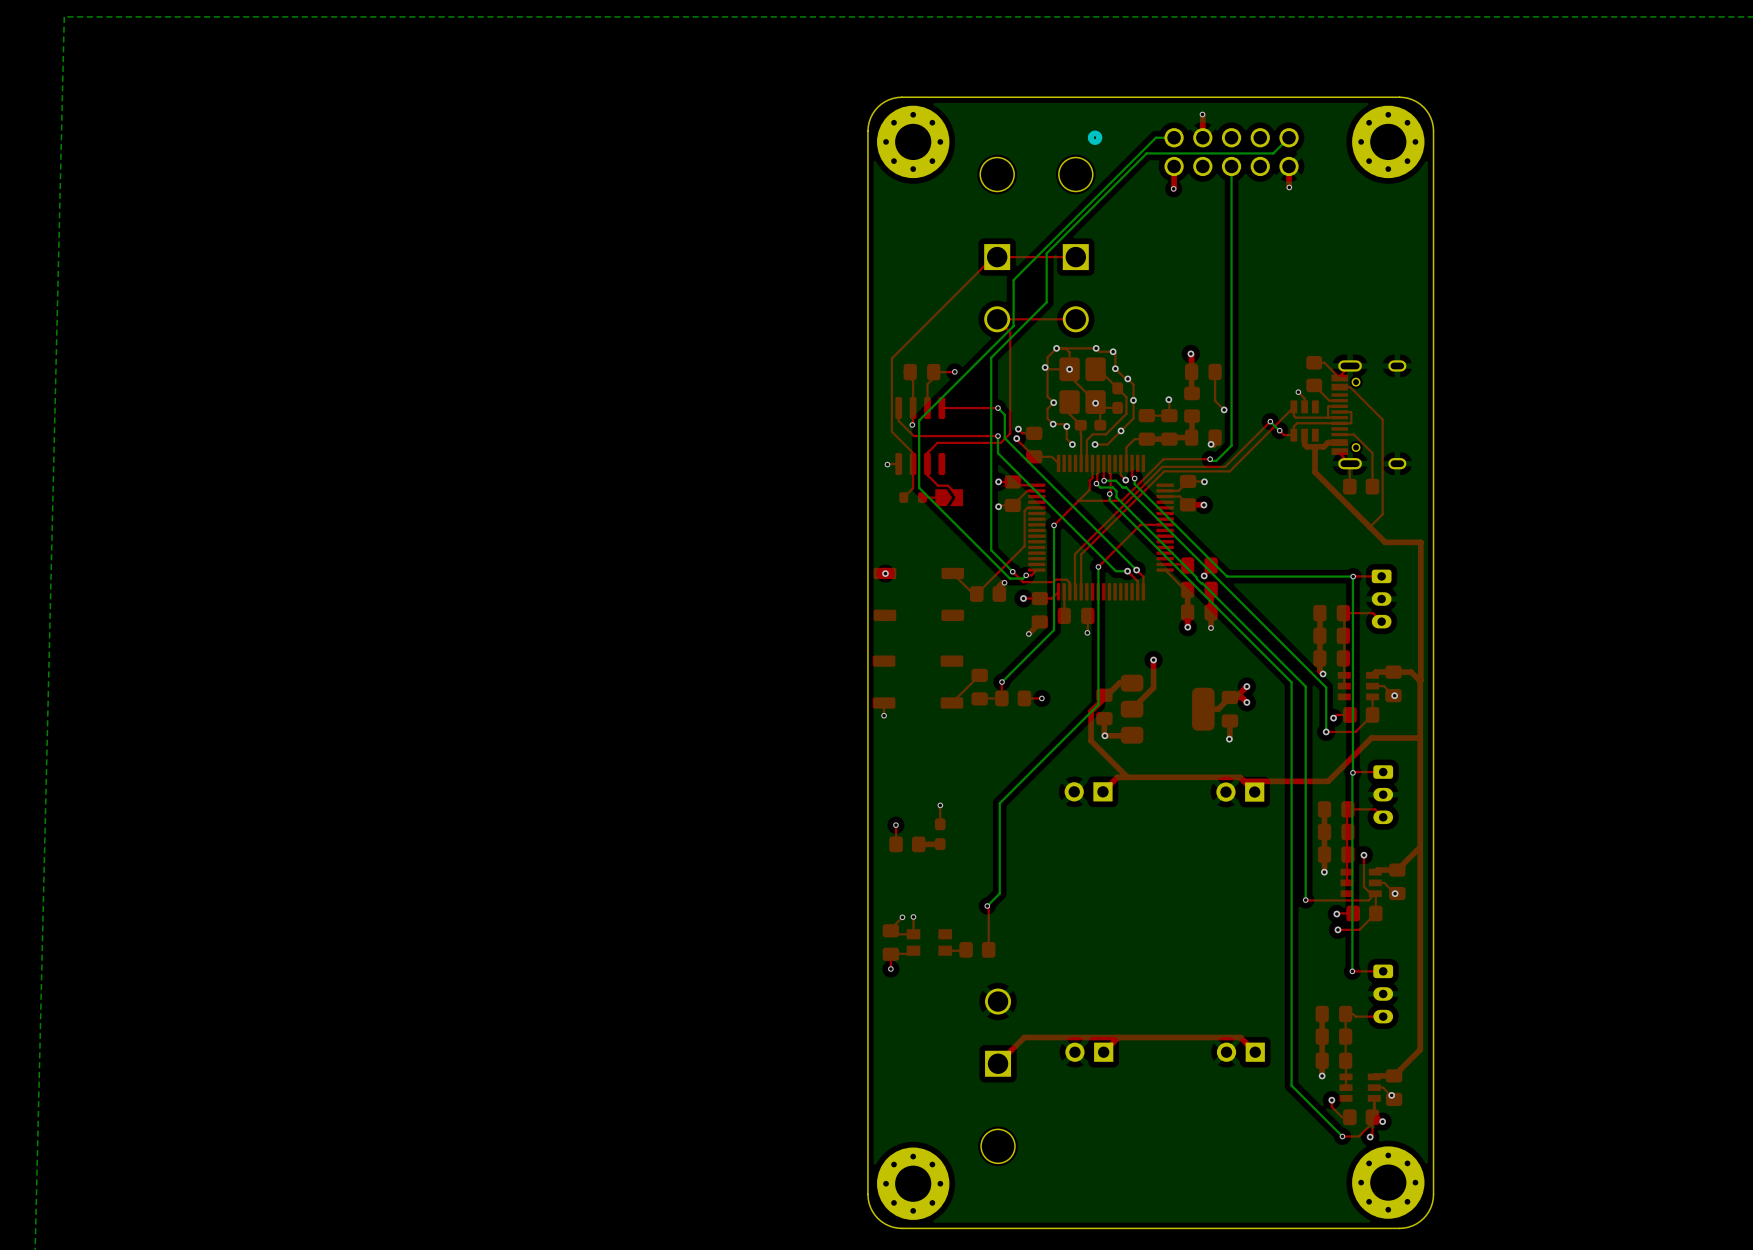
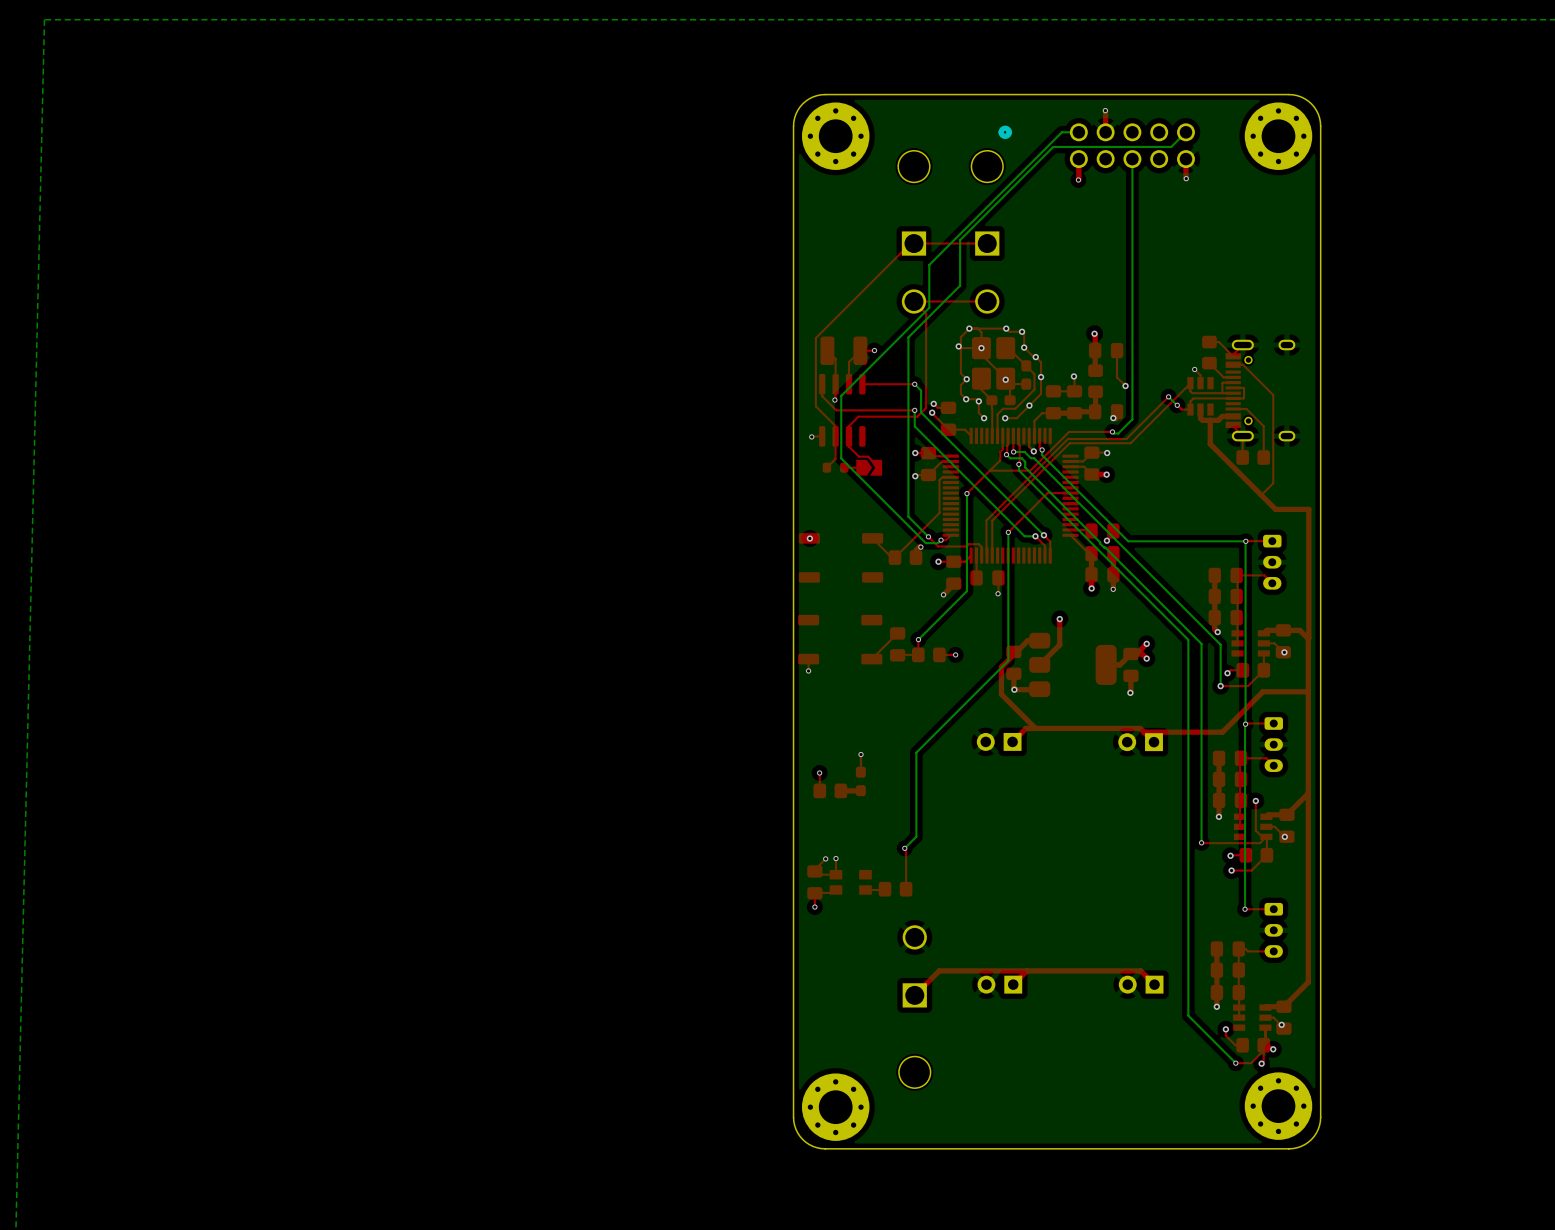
part footprint: [903, 363, 941, 381] -> [820, 336, 868, 365]

